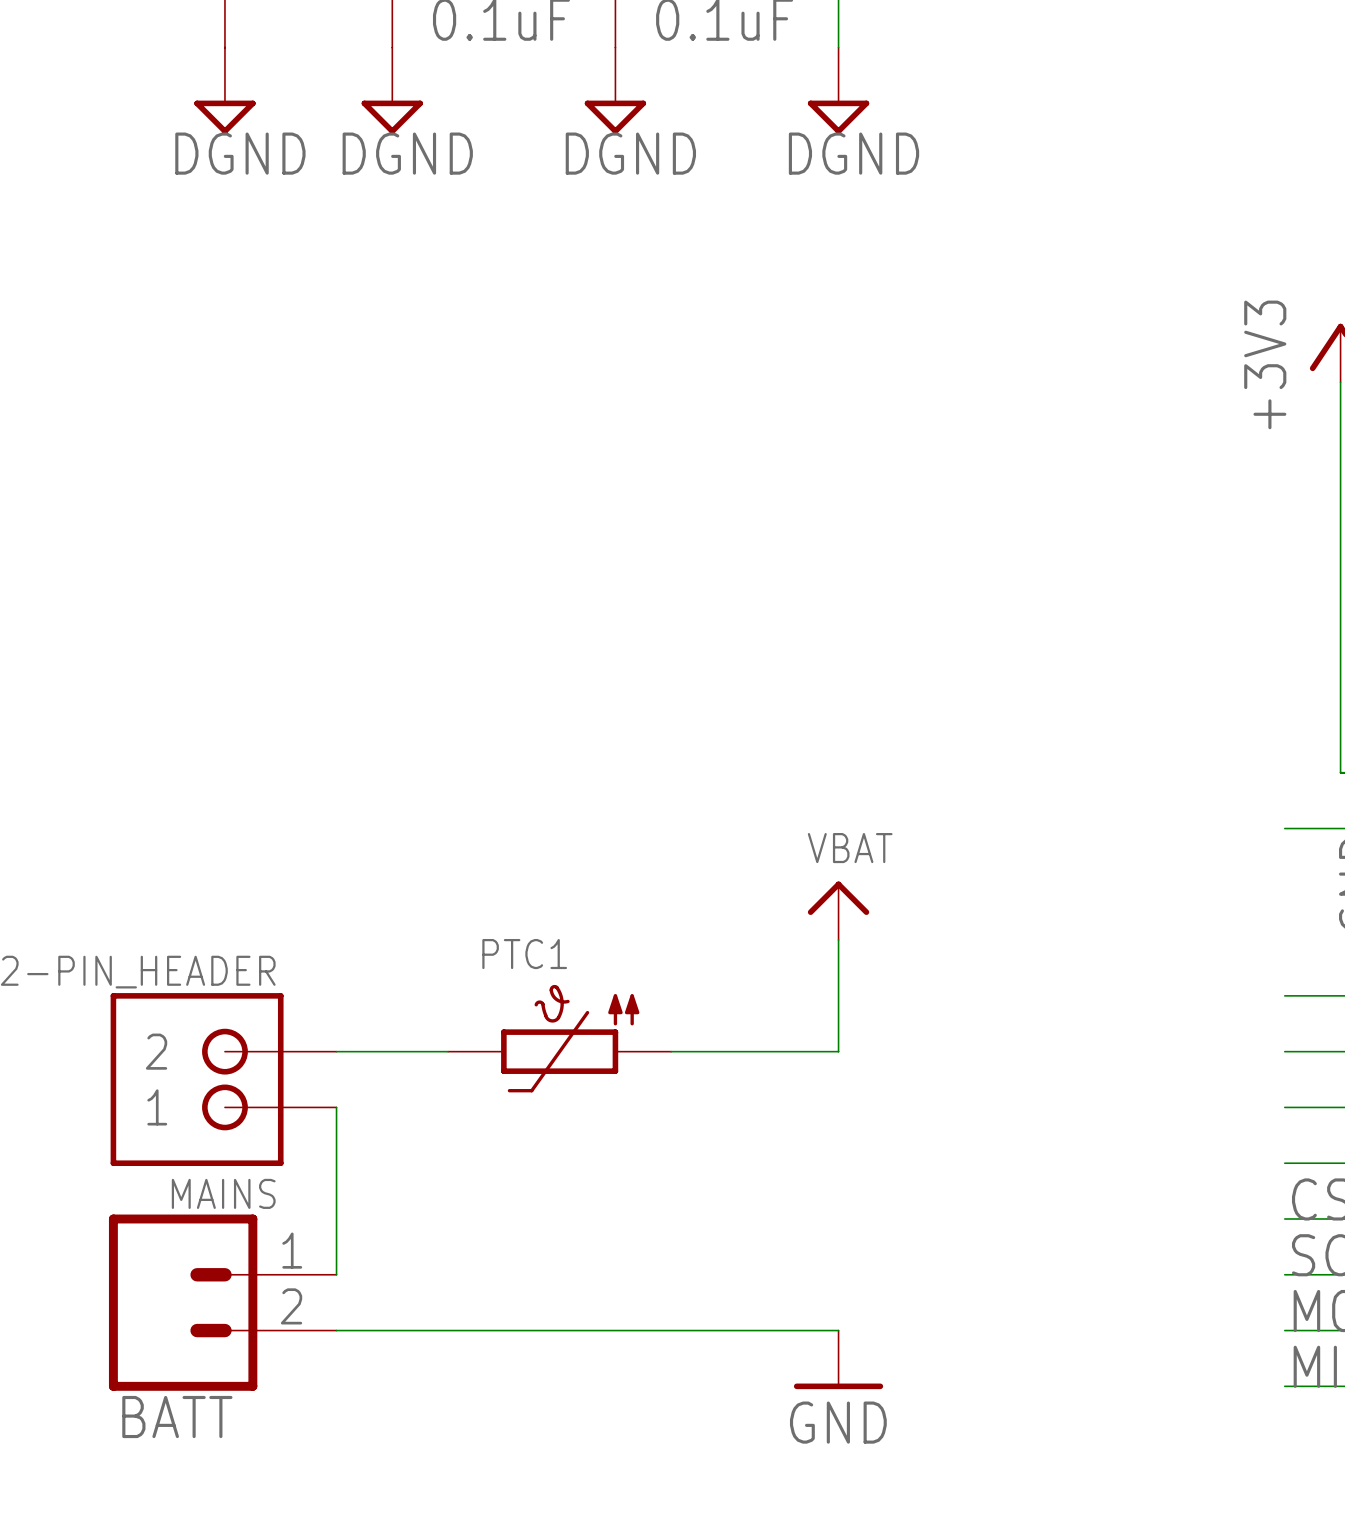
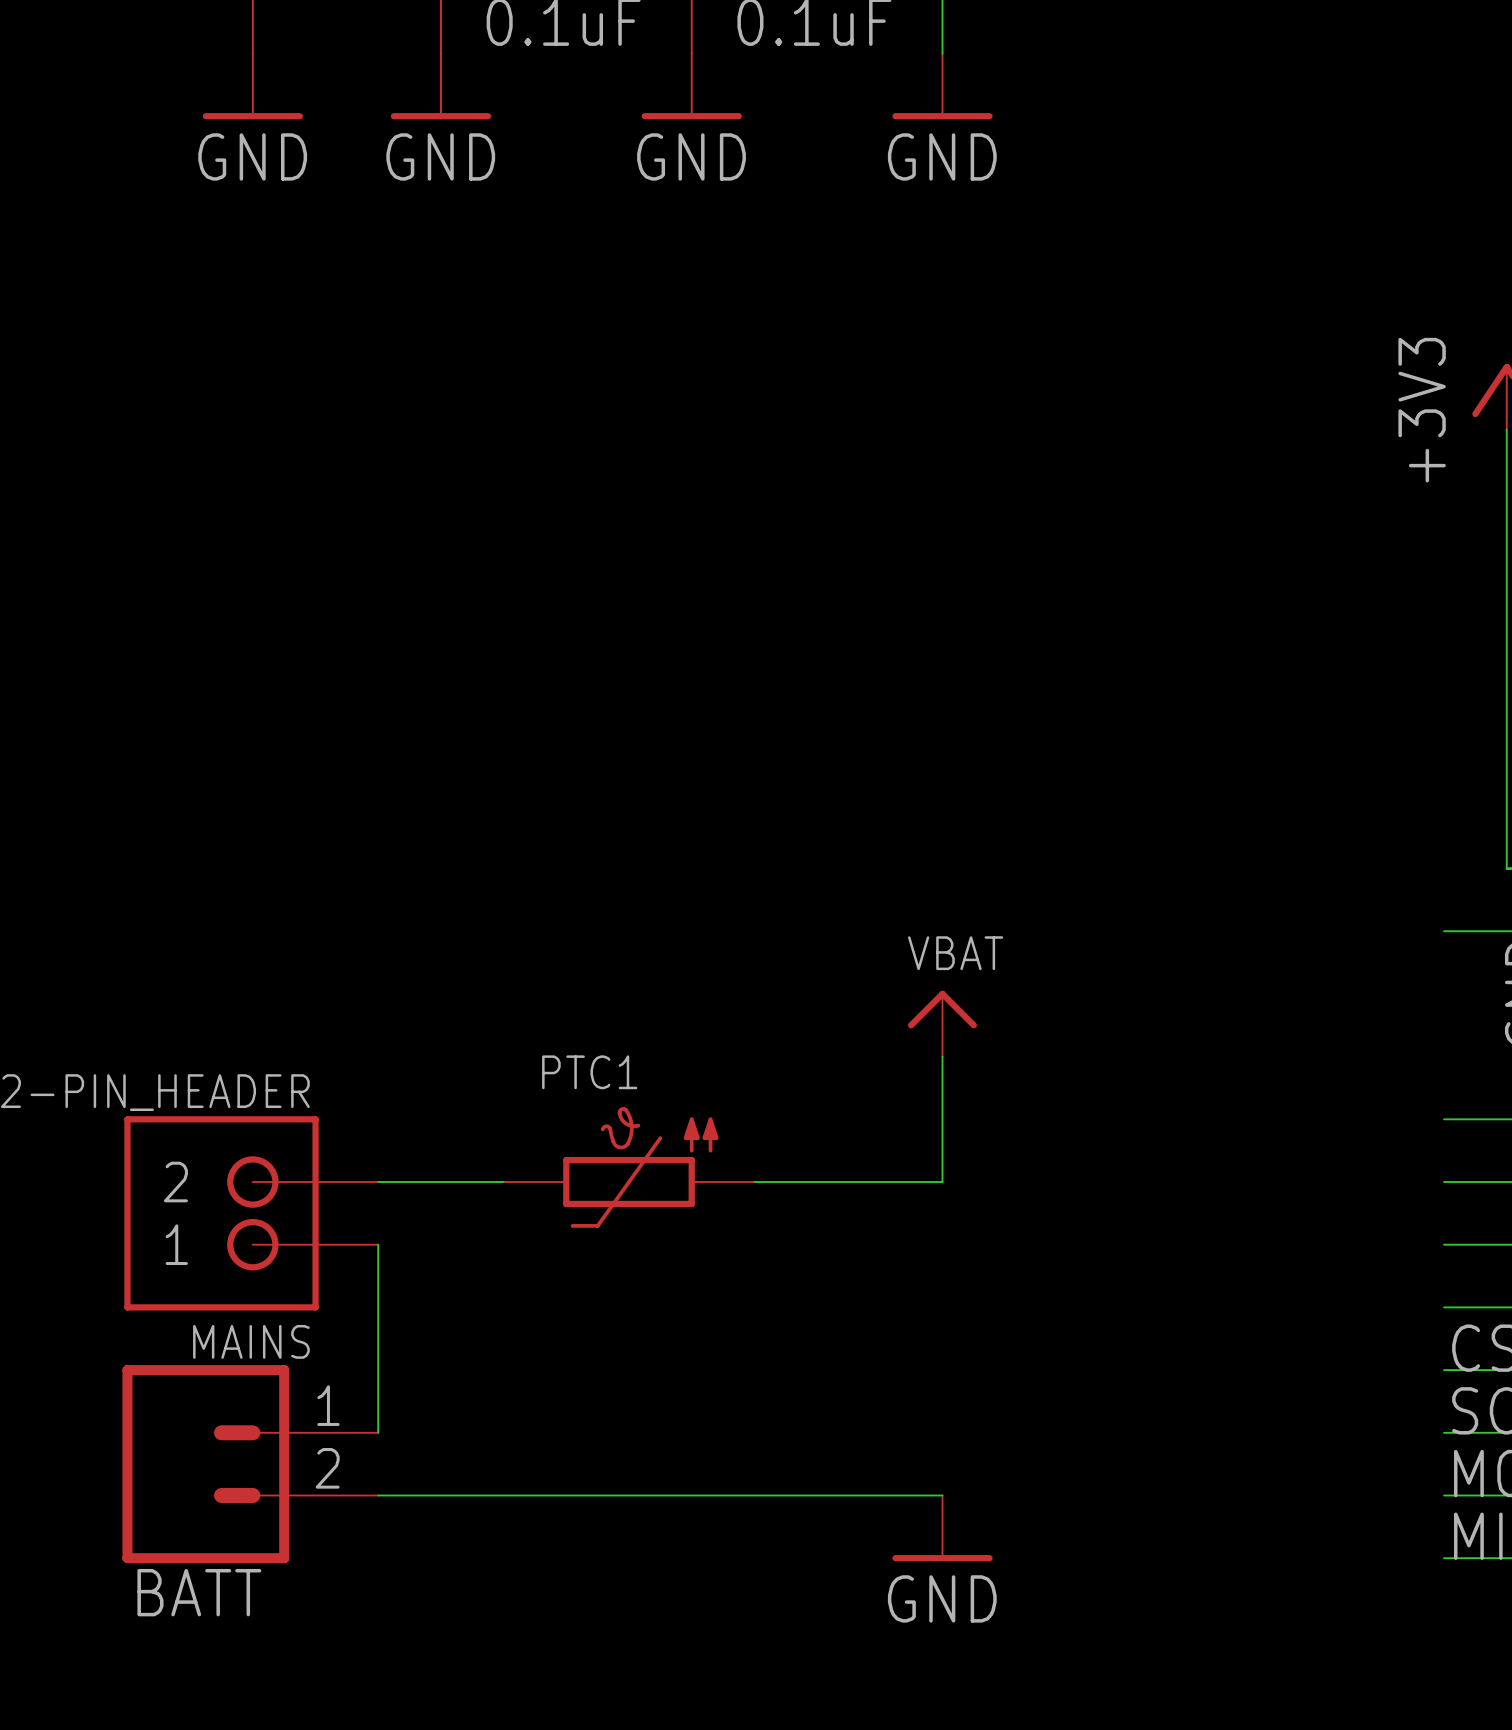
power symbol: DGND (224, 90) -> GND (252, 86)
power symbol: DGND (392, 90) -> GND (440, 86)
power symbol: DGND (615, 90) -> GND (691, 86)
power symbol: DGND (838, 90) -> GND (942, 86)

